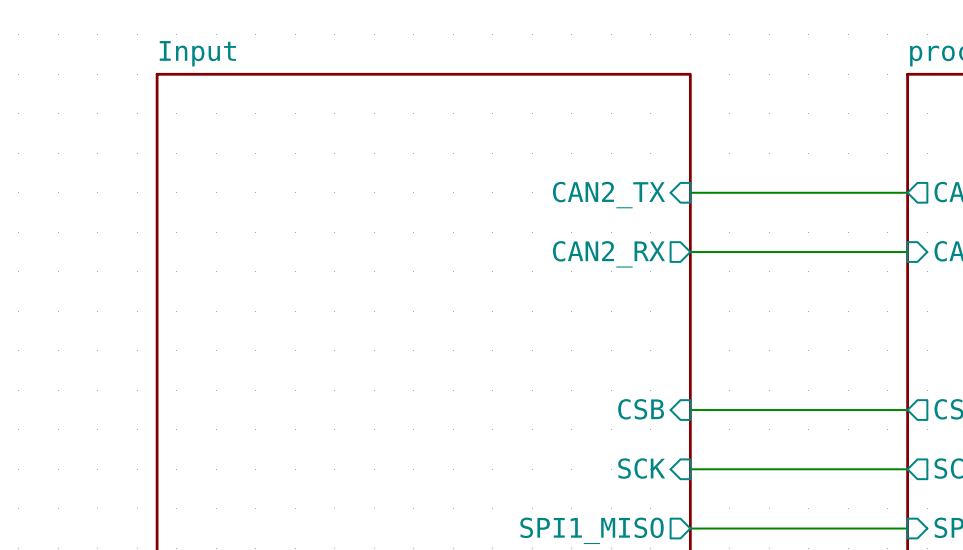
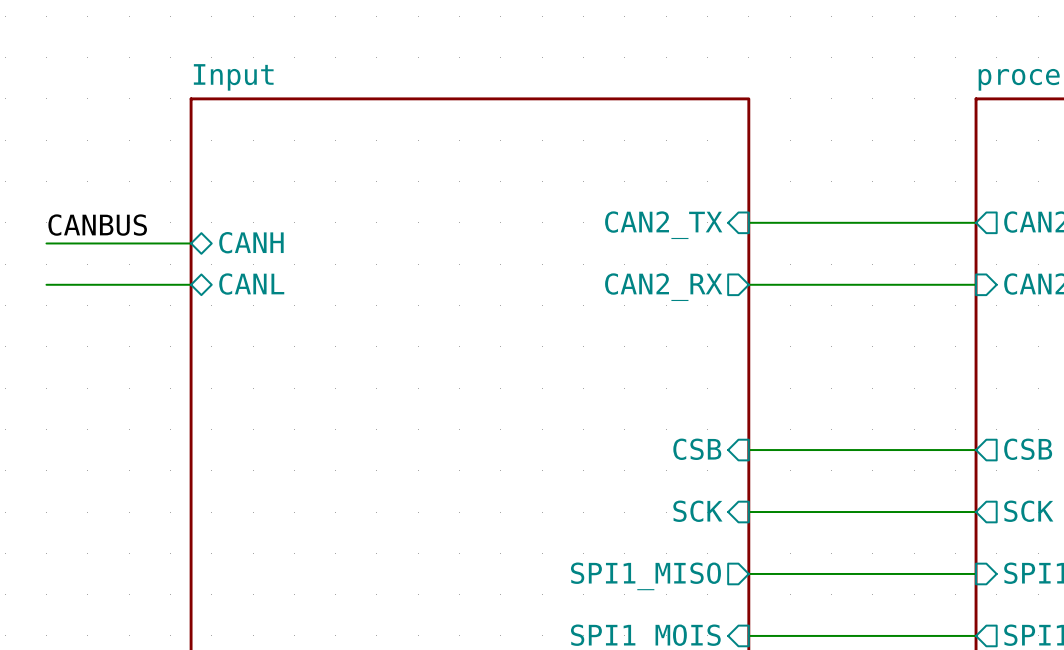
label: none -> CANBUS (97, 225)
sheet pin: none -> CANH (251, 242)
wire: none -> (46, 243) (191, 243)
sheet pin: none -> CANL (251, 284)
wire: none -> (46, 284) (191, 284)

